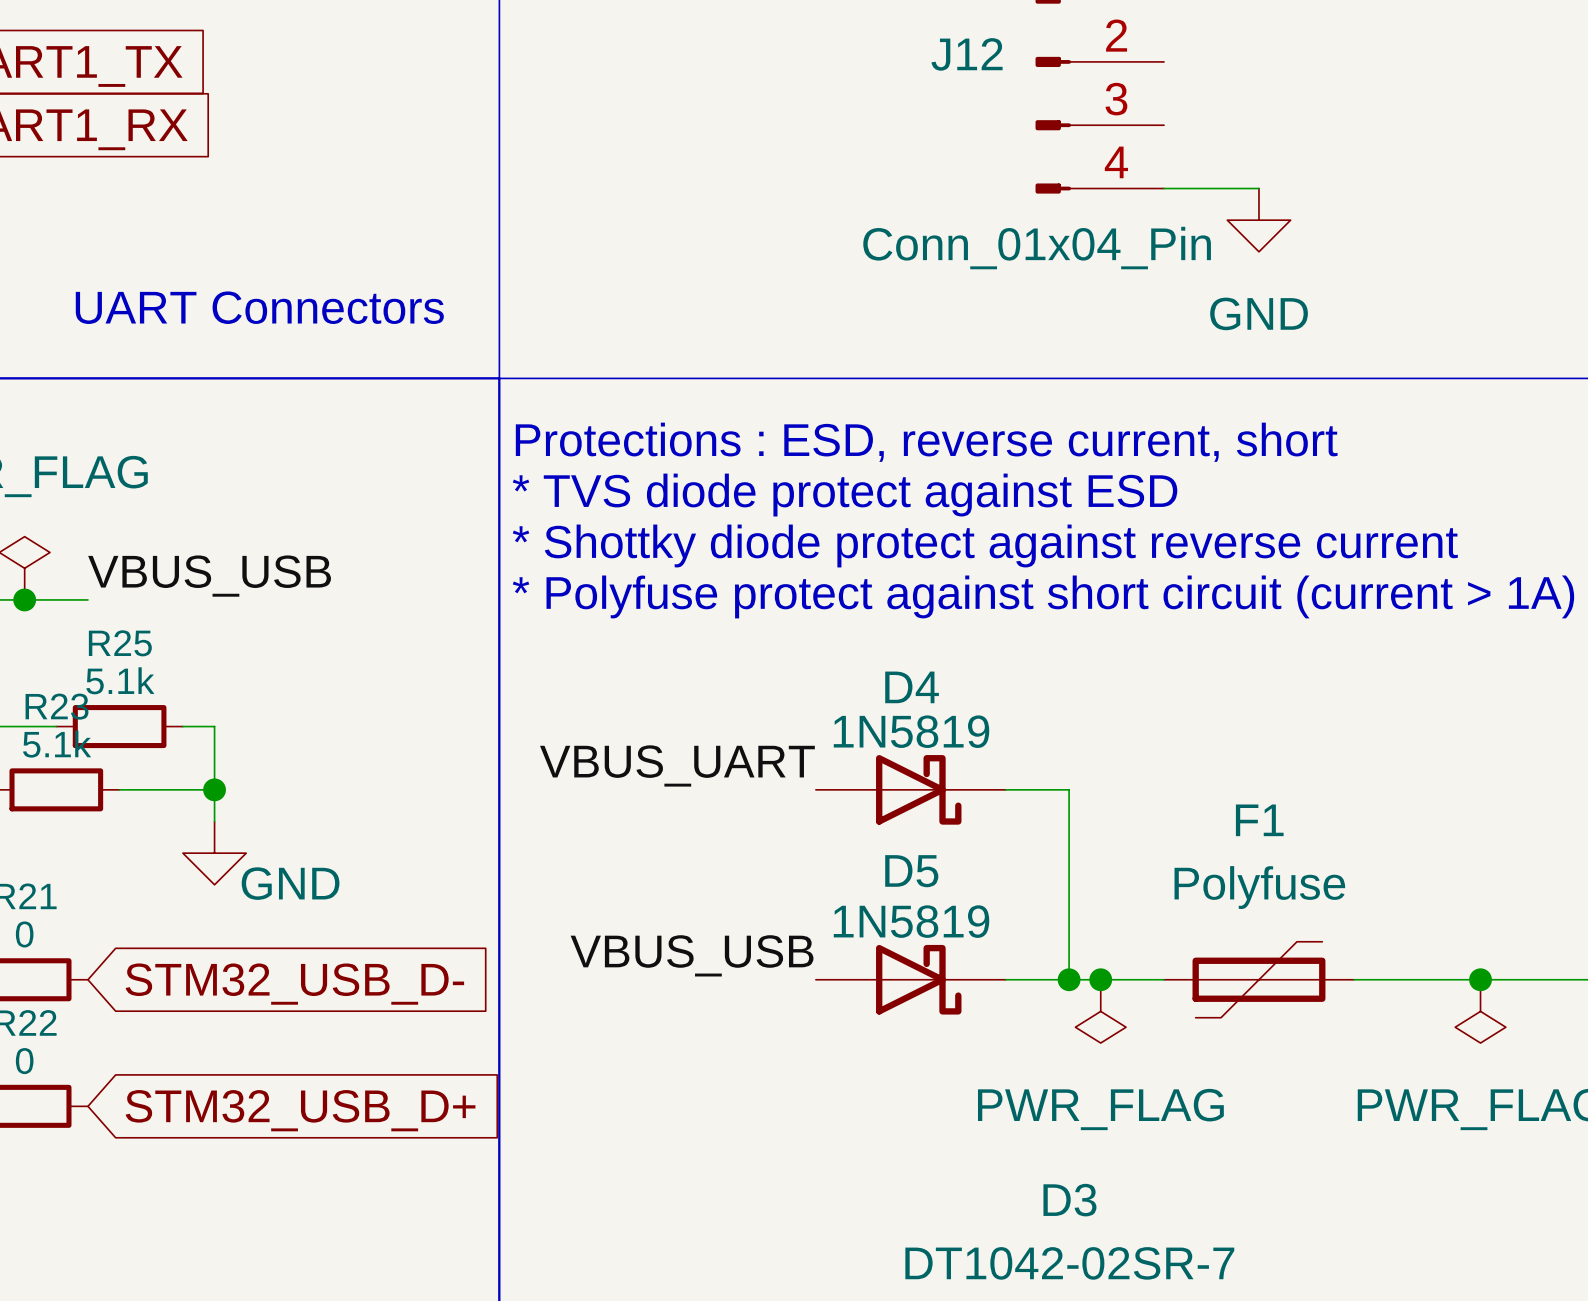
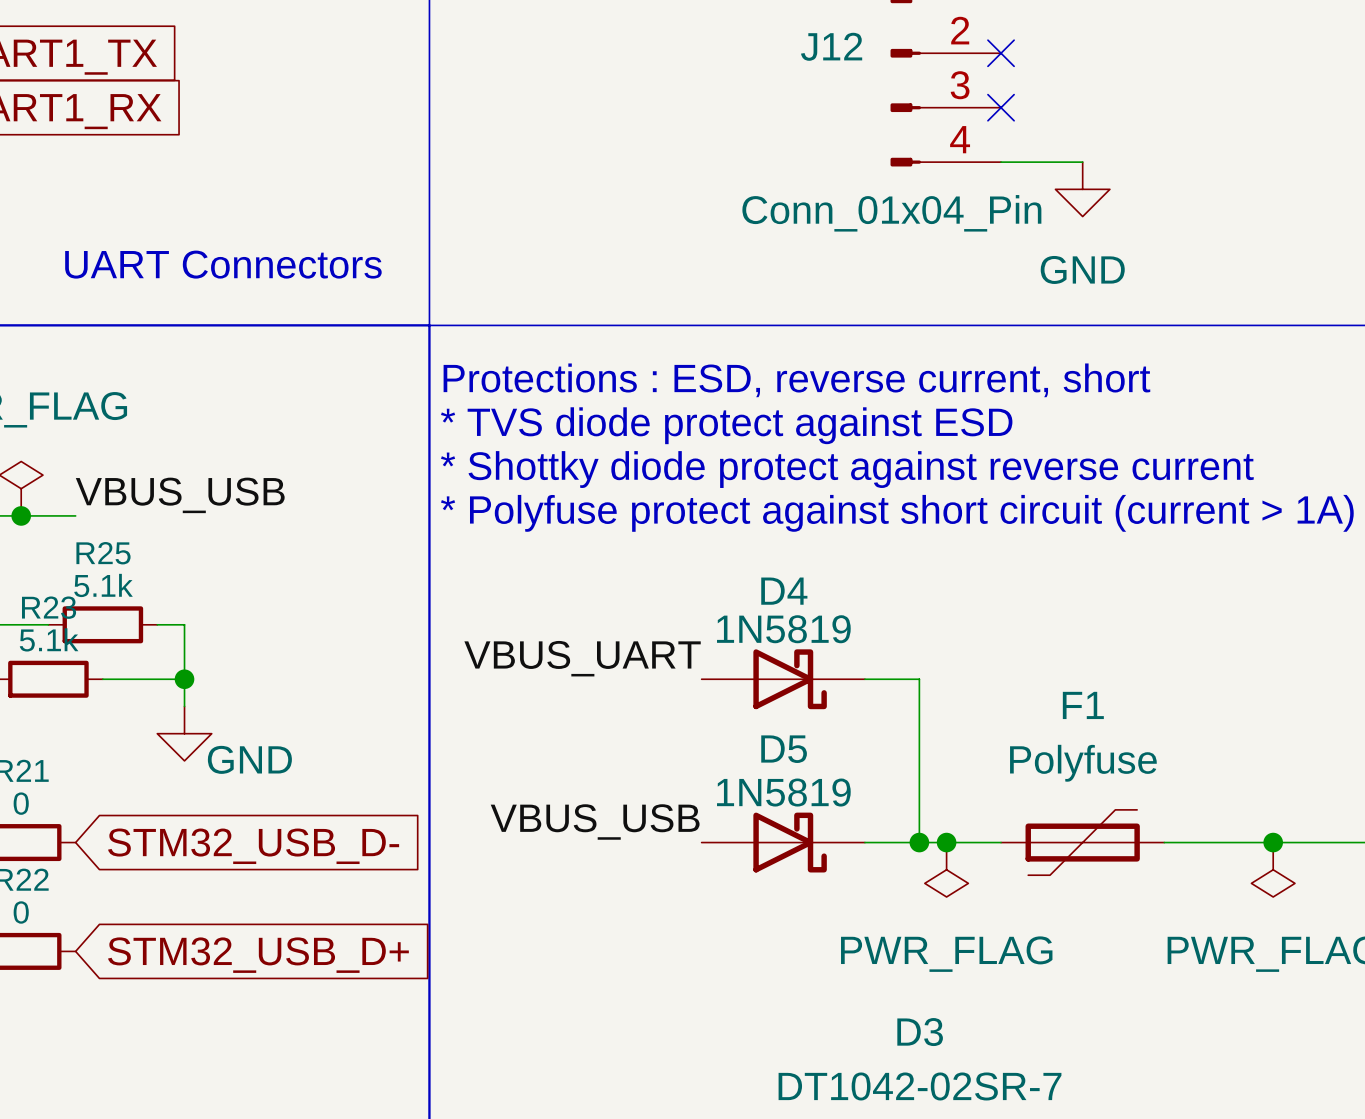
no-connect mark: none -> (1001, 53)
no-connect mark: none -> (1001, 107)

